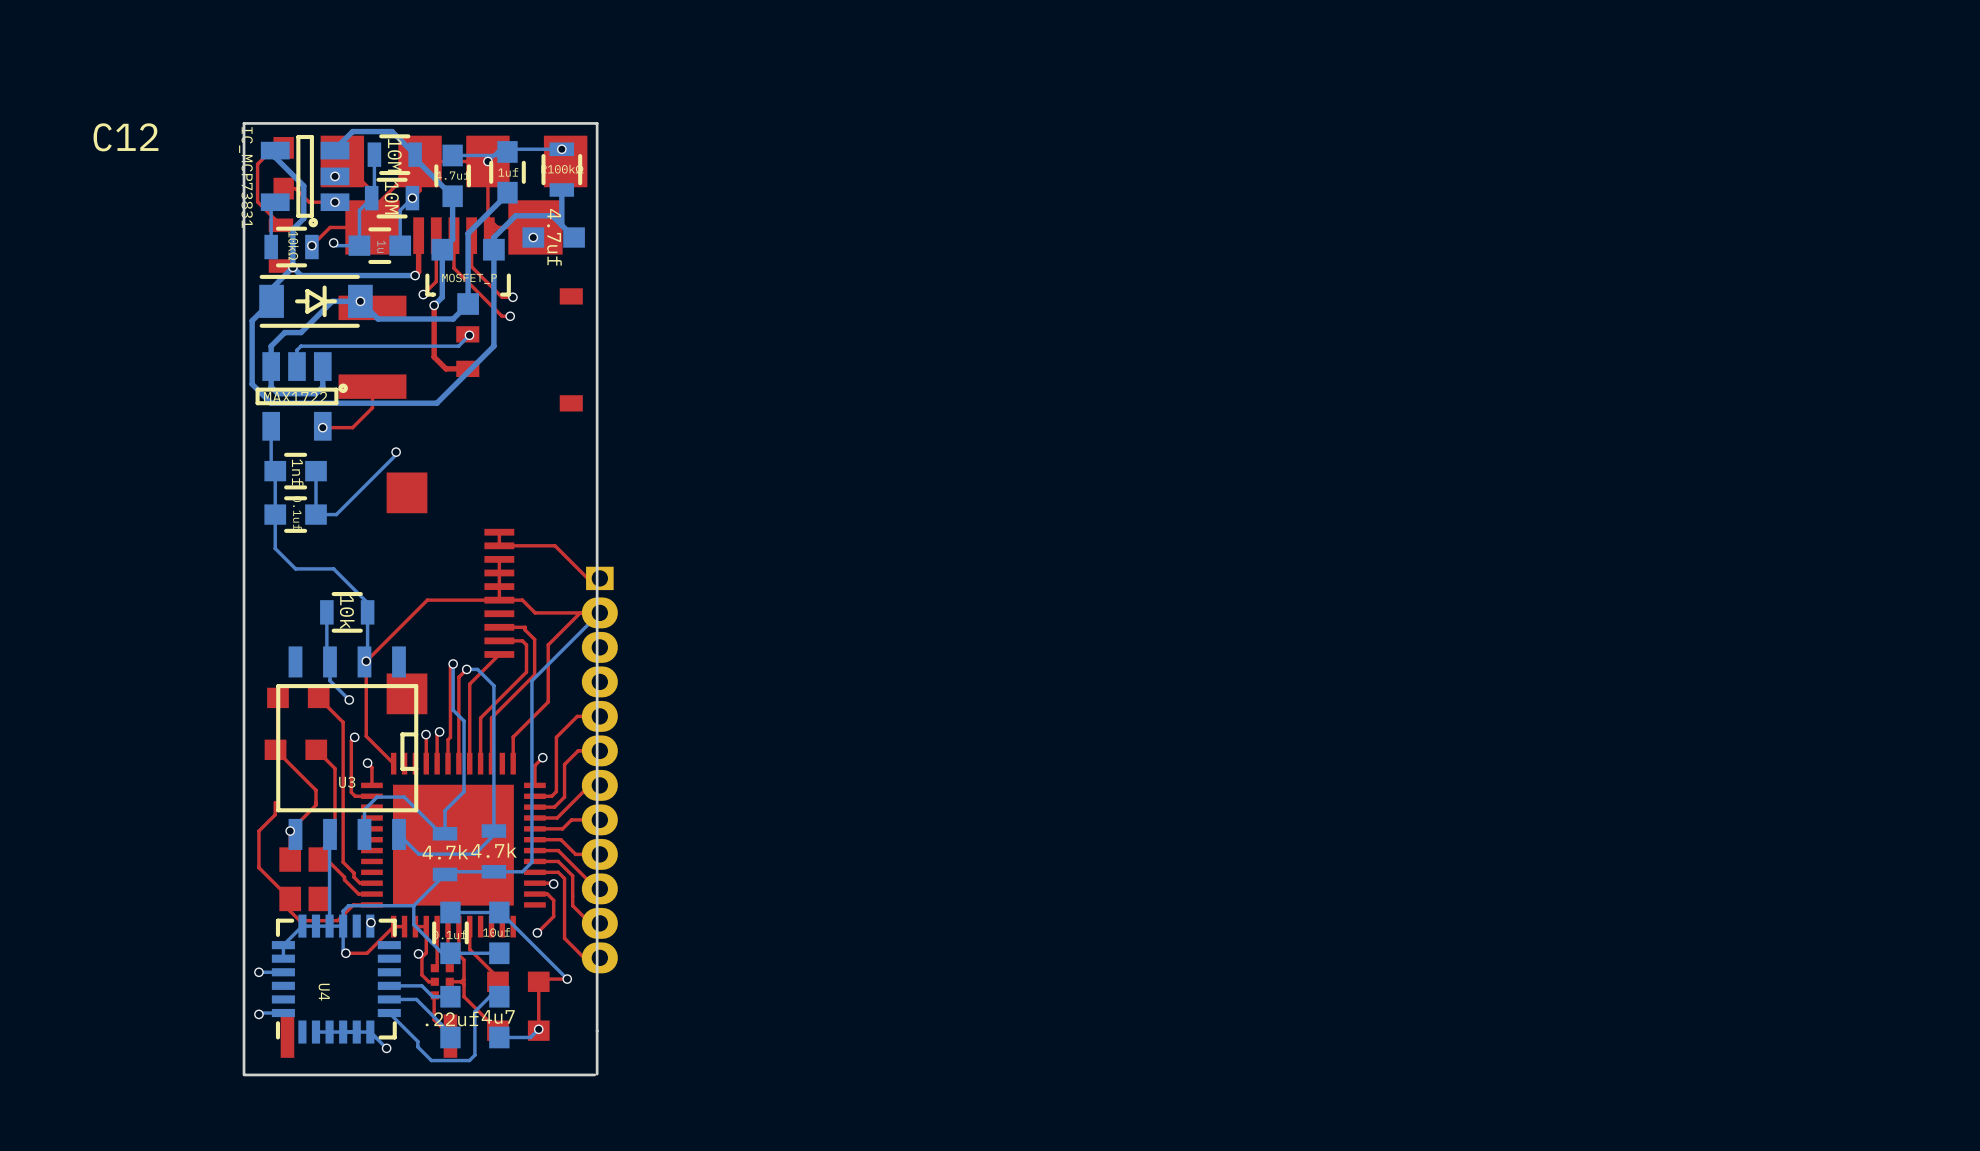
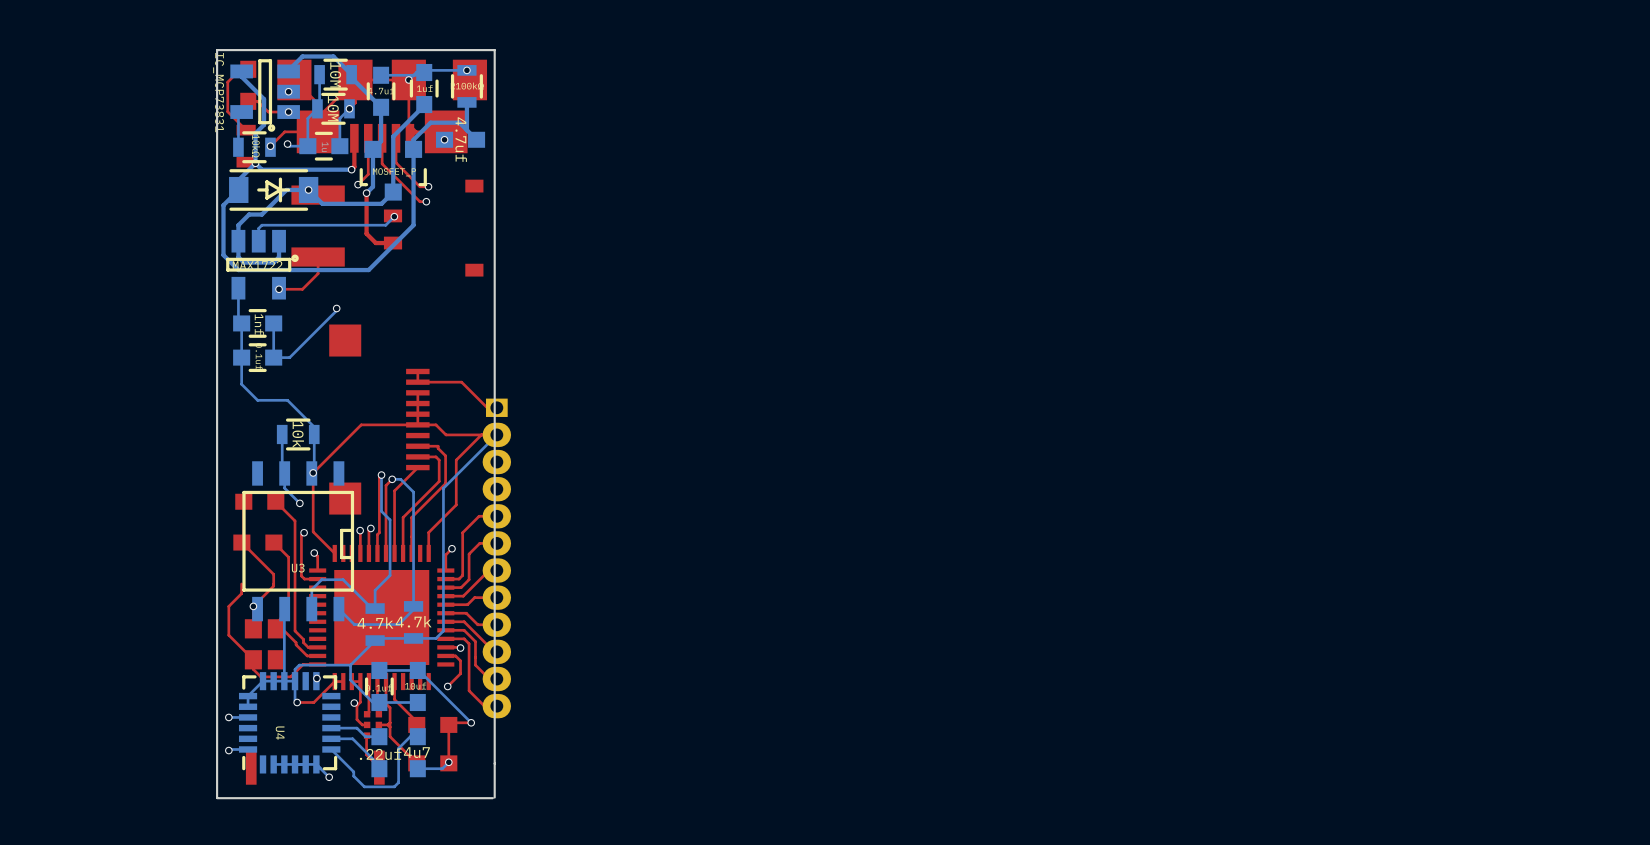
C12 name: C12 (125, 137) -> none

